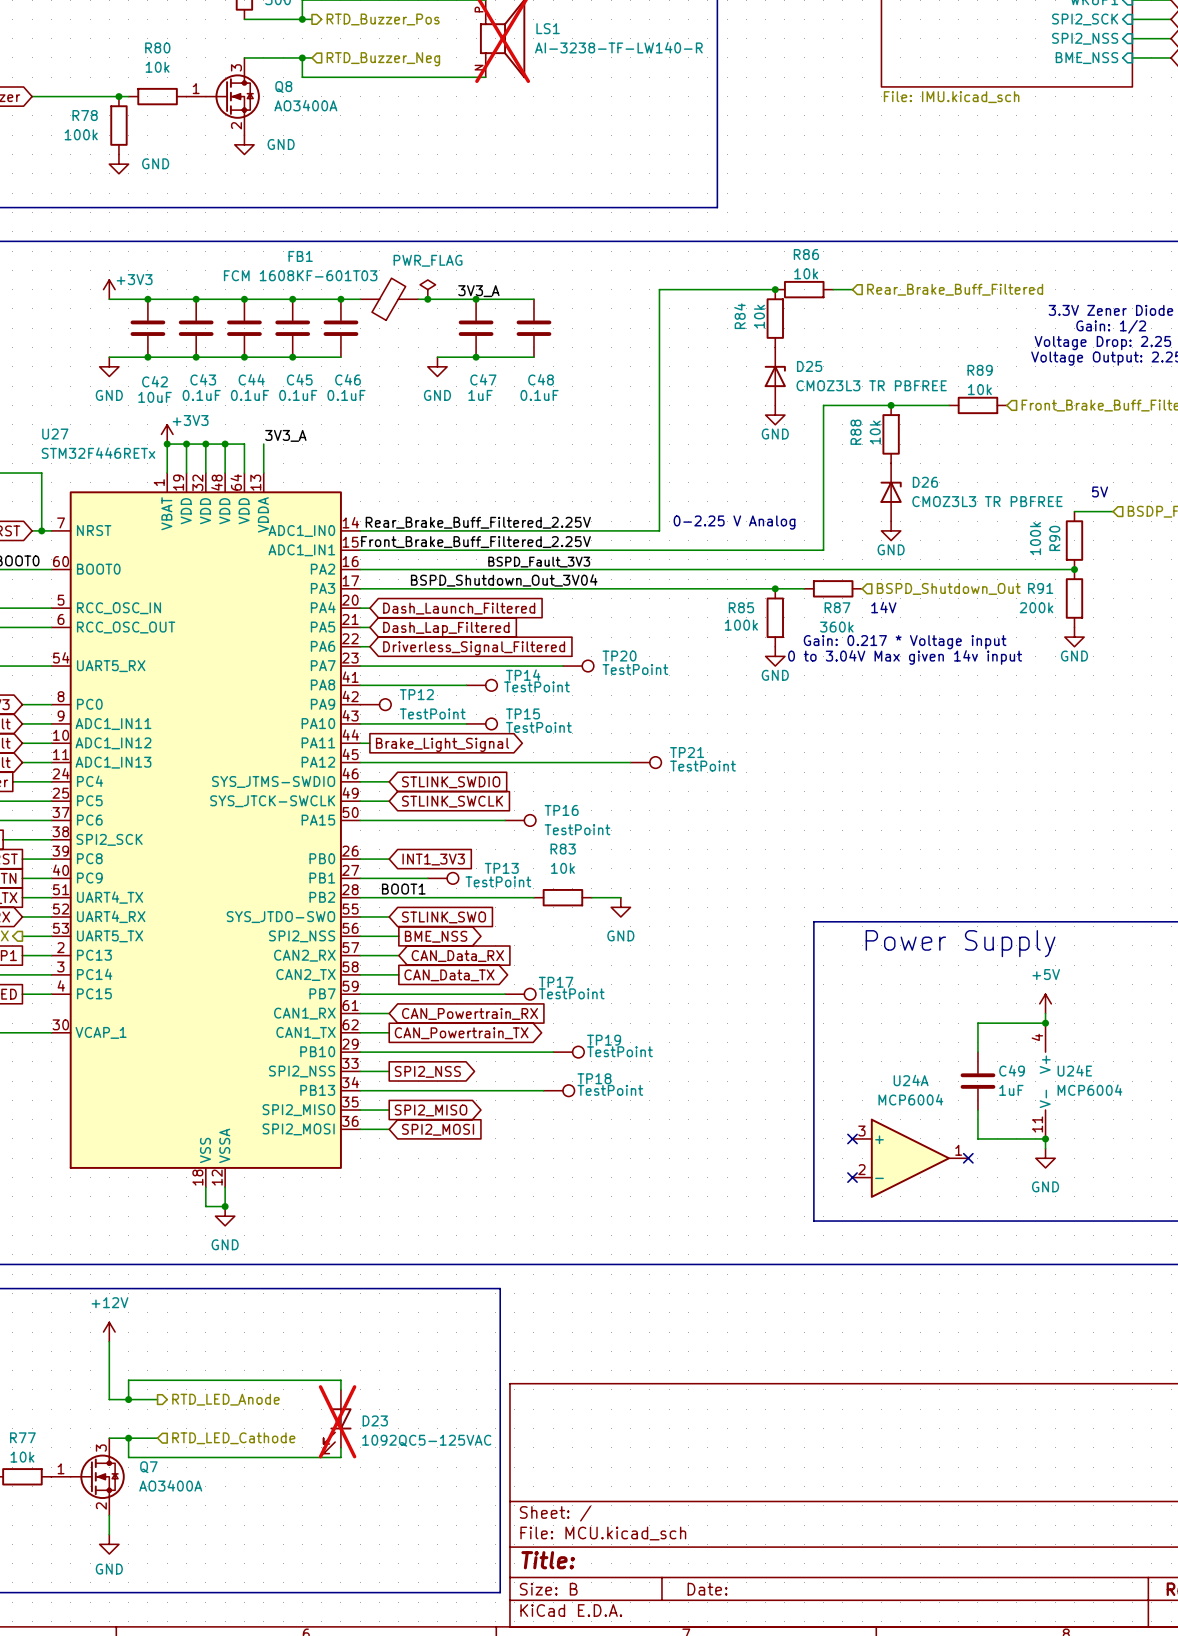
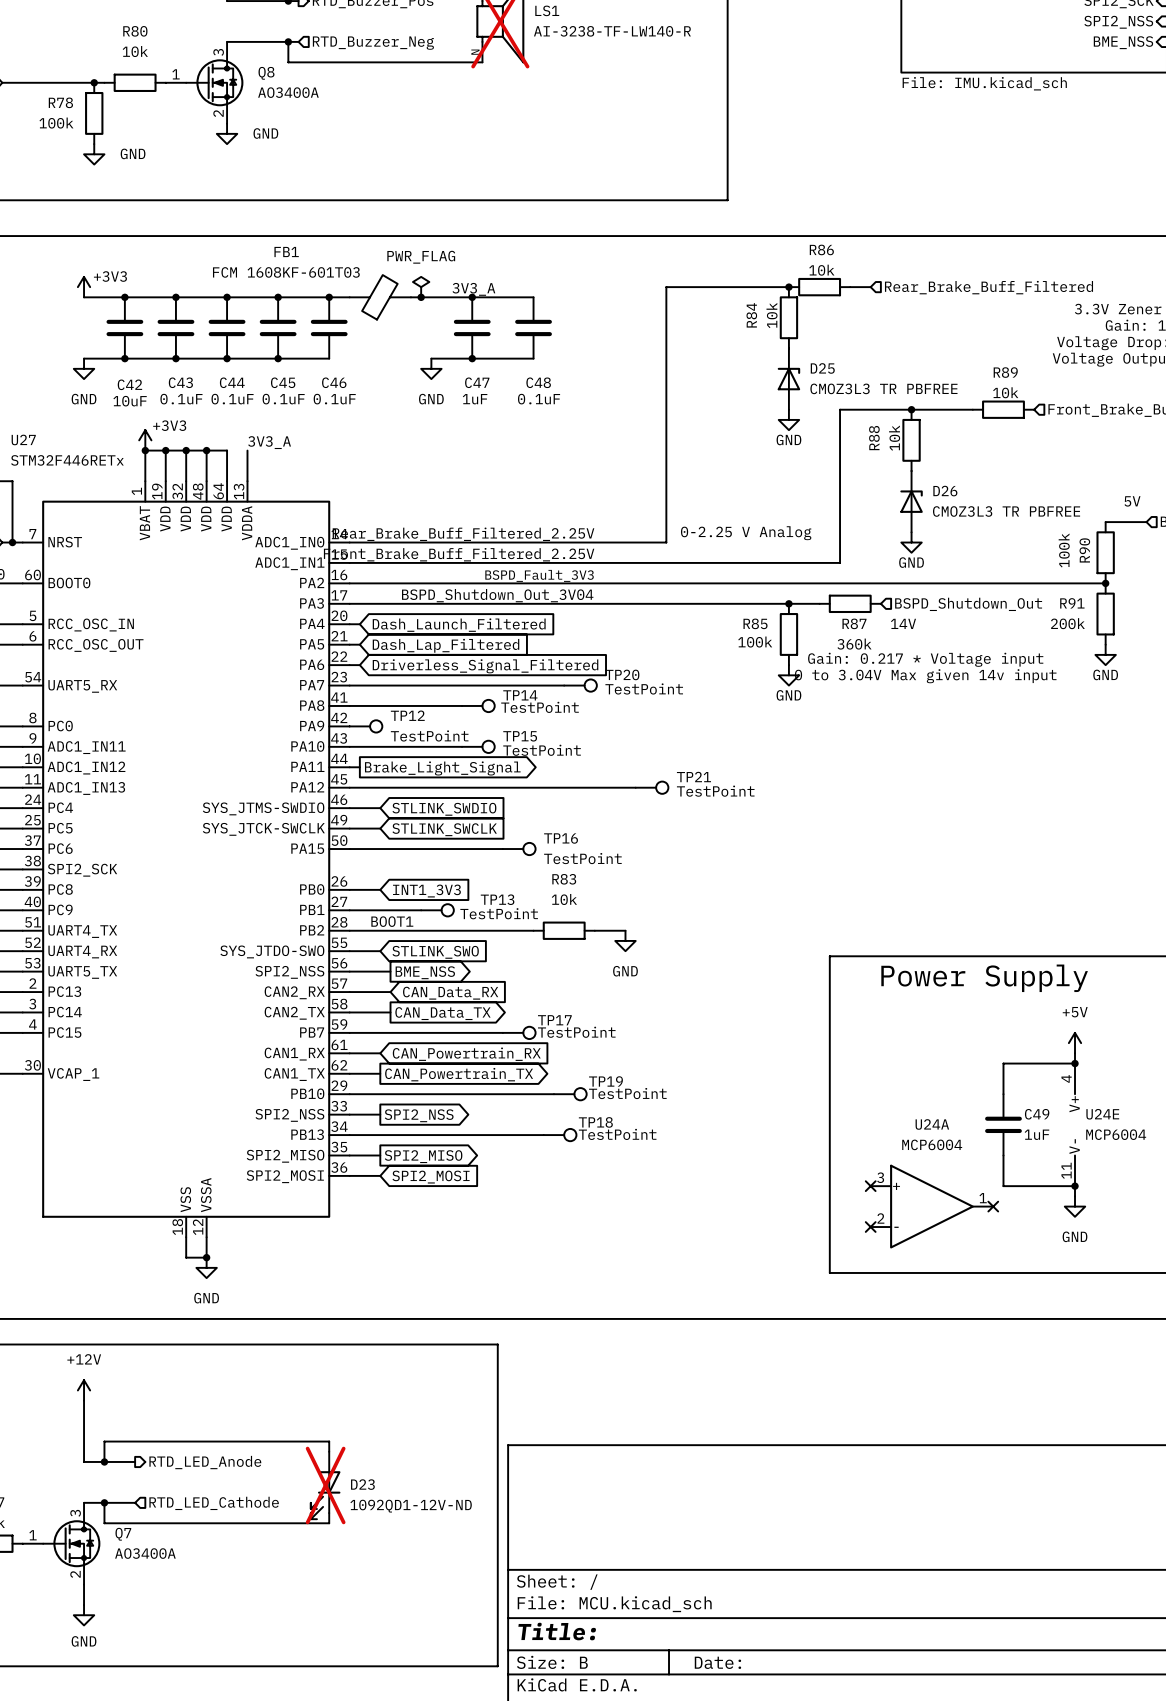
D23 value: 1092QC5-125VAC (426, 1440) -> 1092QD1-12V-ND (411, 1506)

